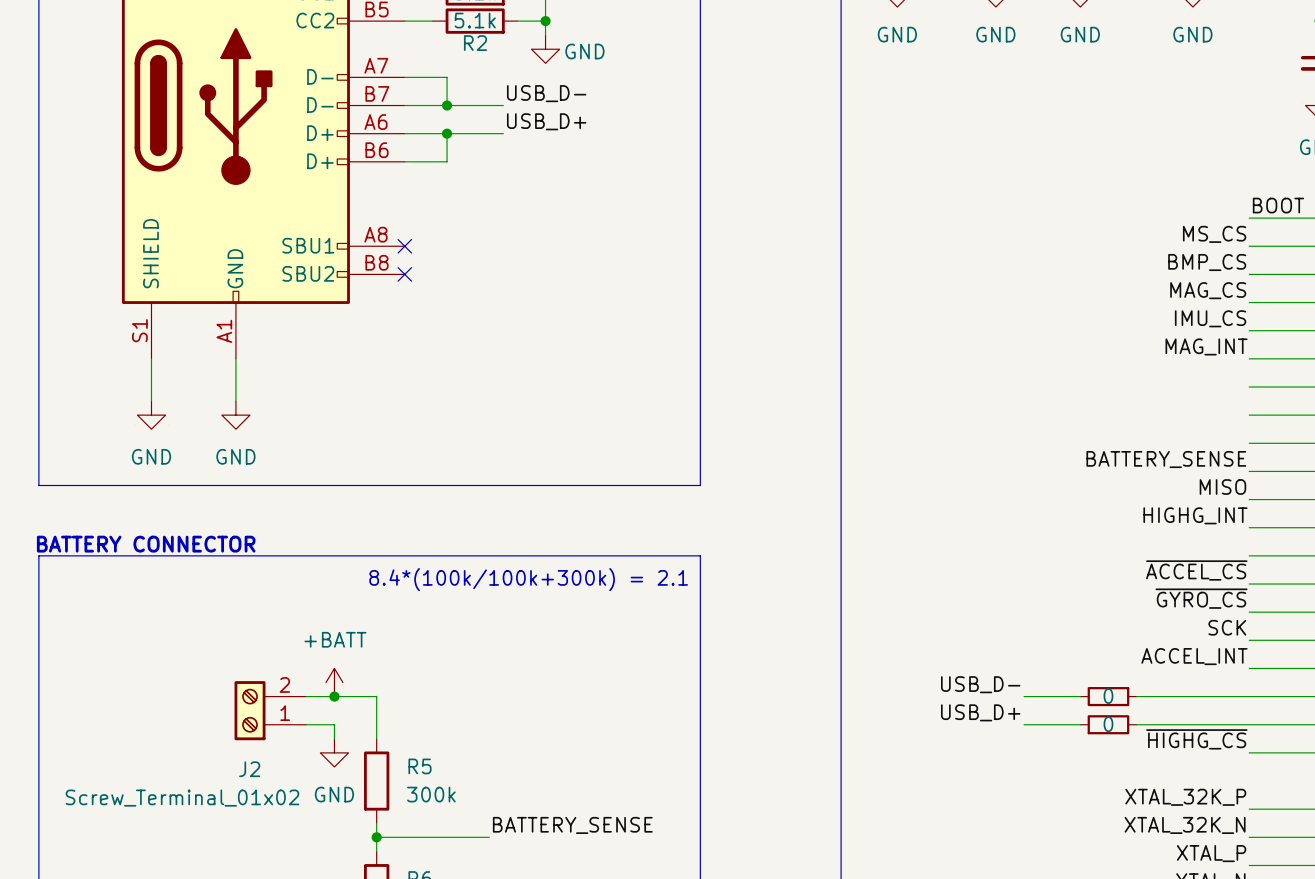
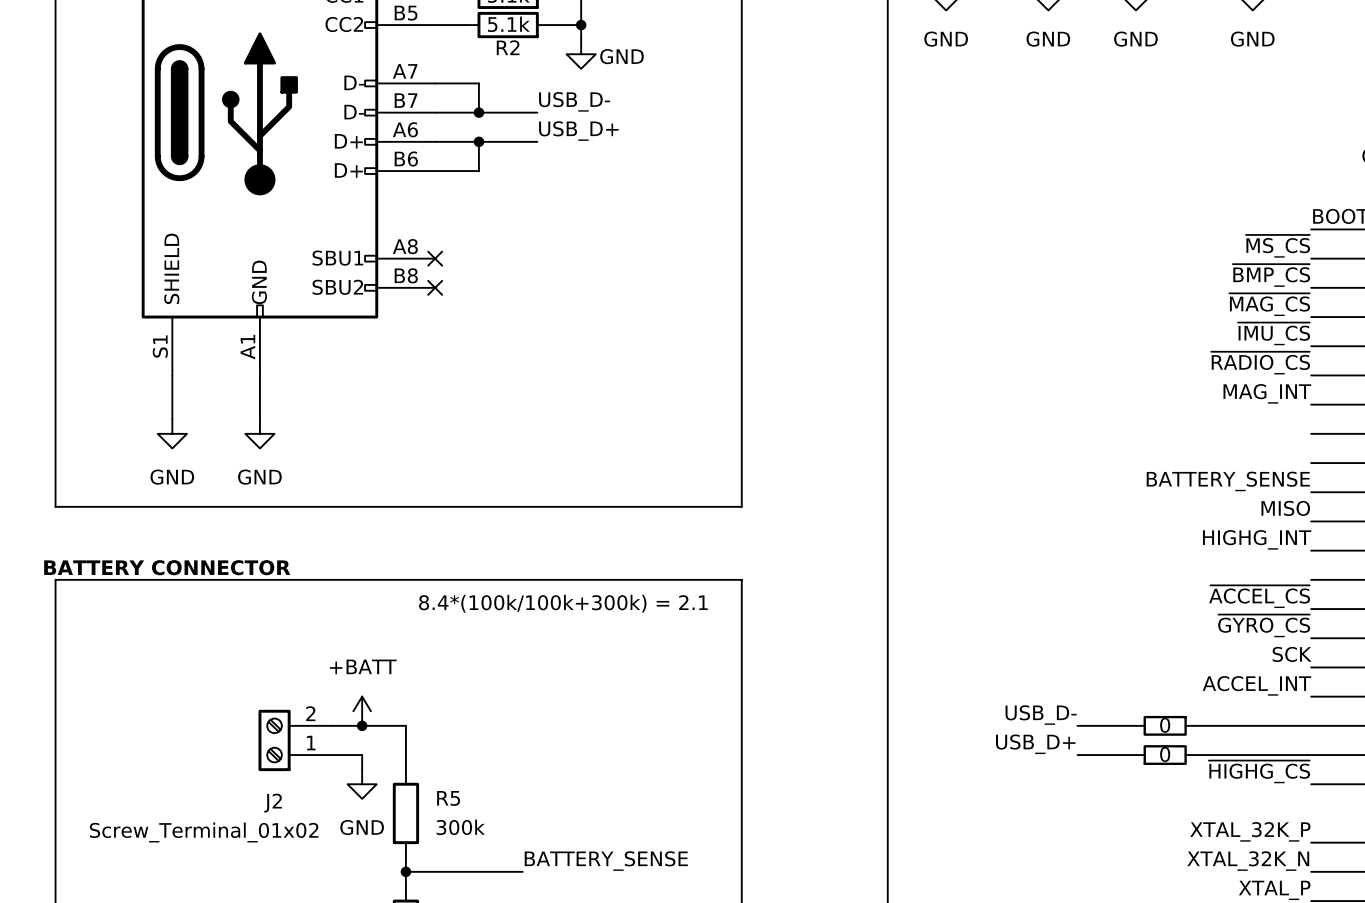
label: MS_CS (1214, 234) -> ~{MS_CS} (1277, 246)
label: BMP_CS (1207, 262) -> ~{BMP_CS} (1271, 275)
label: MAG_CS (1208, 290) -> ~{MAG_CS} (1269, 304)
label: IMU_CS (1210, 318) -> ~{IMU_CS} (1274, 333)
label: MAG_INT (1206, 346) -> ~{RADIO_CS} (1260, 363)
label: none -> MAG_INT (1267, 393)

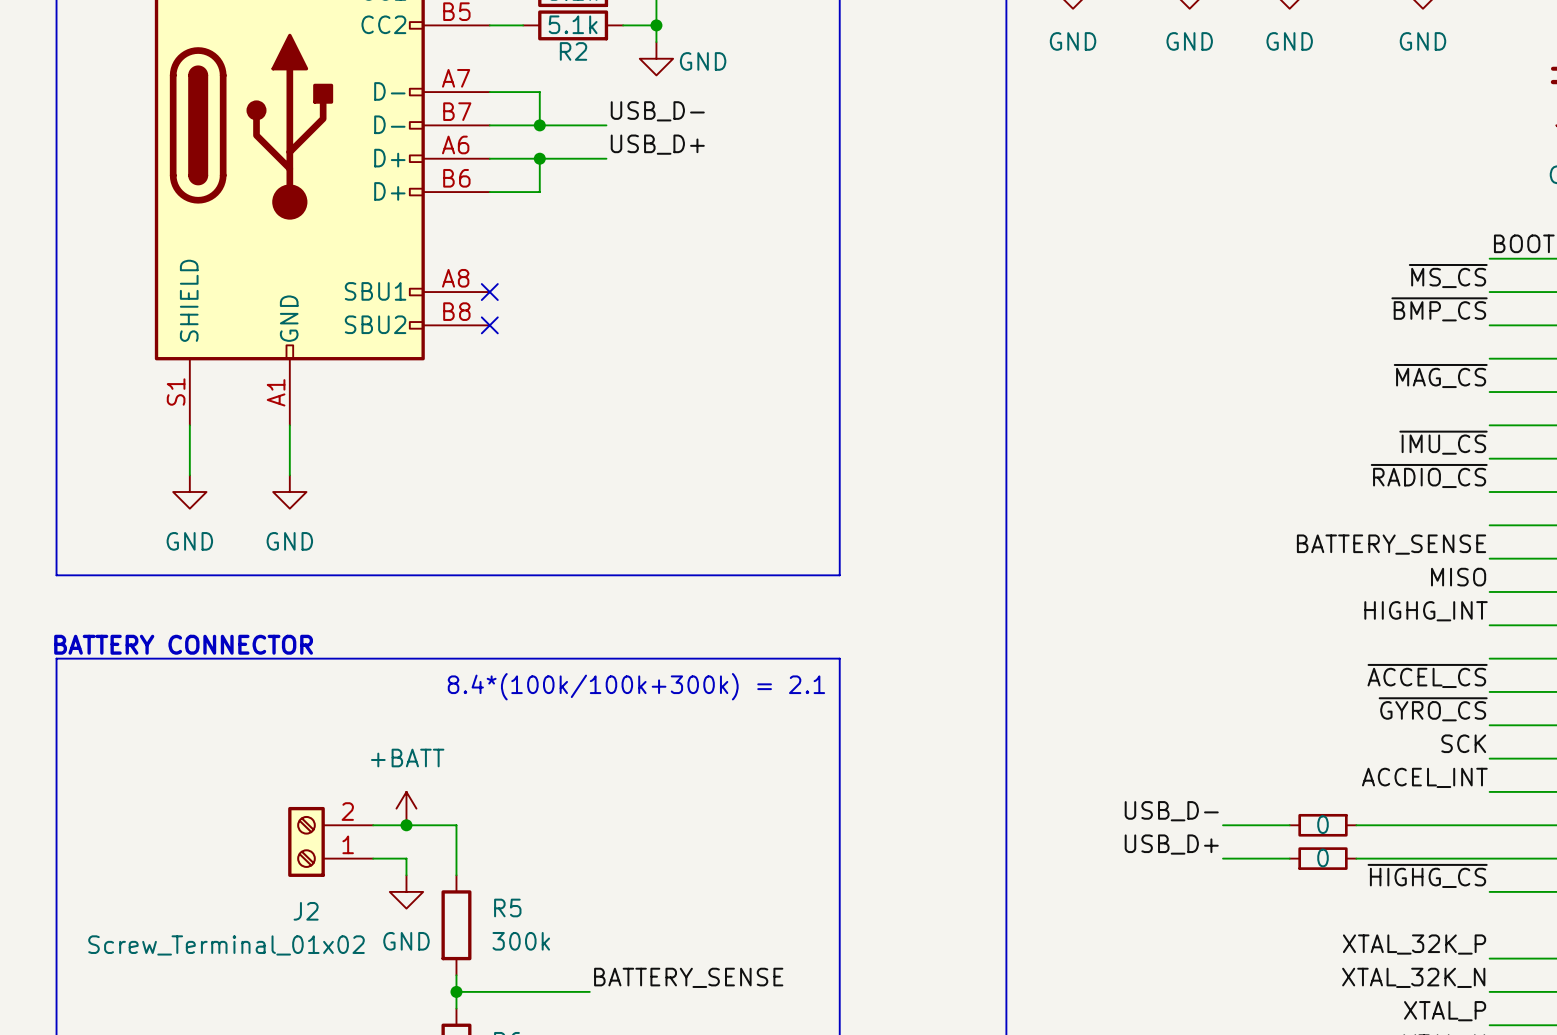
label: ~{MAG_CS} (1269, 304) -> none
label: ~{IMU_CS} (1274, 333) -> ~{MAG_CS} (1440, 376)
label position: ~{RADIO_CS} (1260, 363) -> ~{RADIO_CS} (1429, 476)
label: MAG_INT (1267, 393) -> ~{IMU_CS} (1443, 442)

